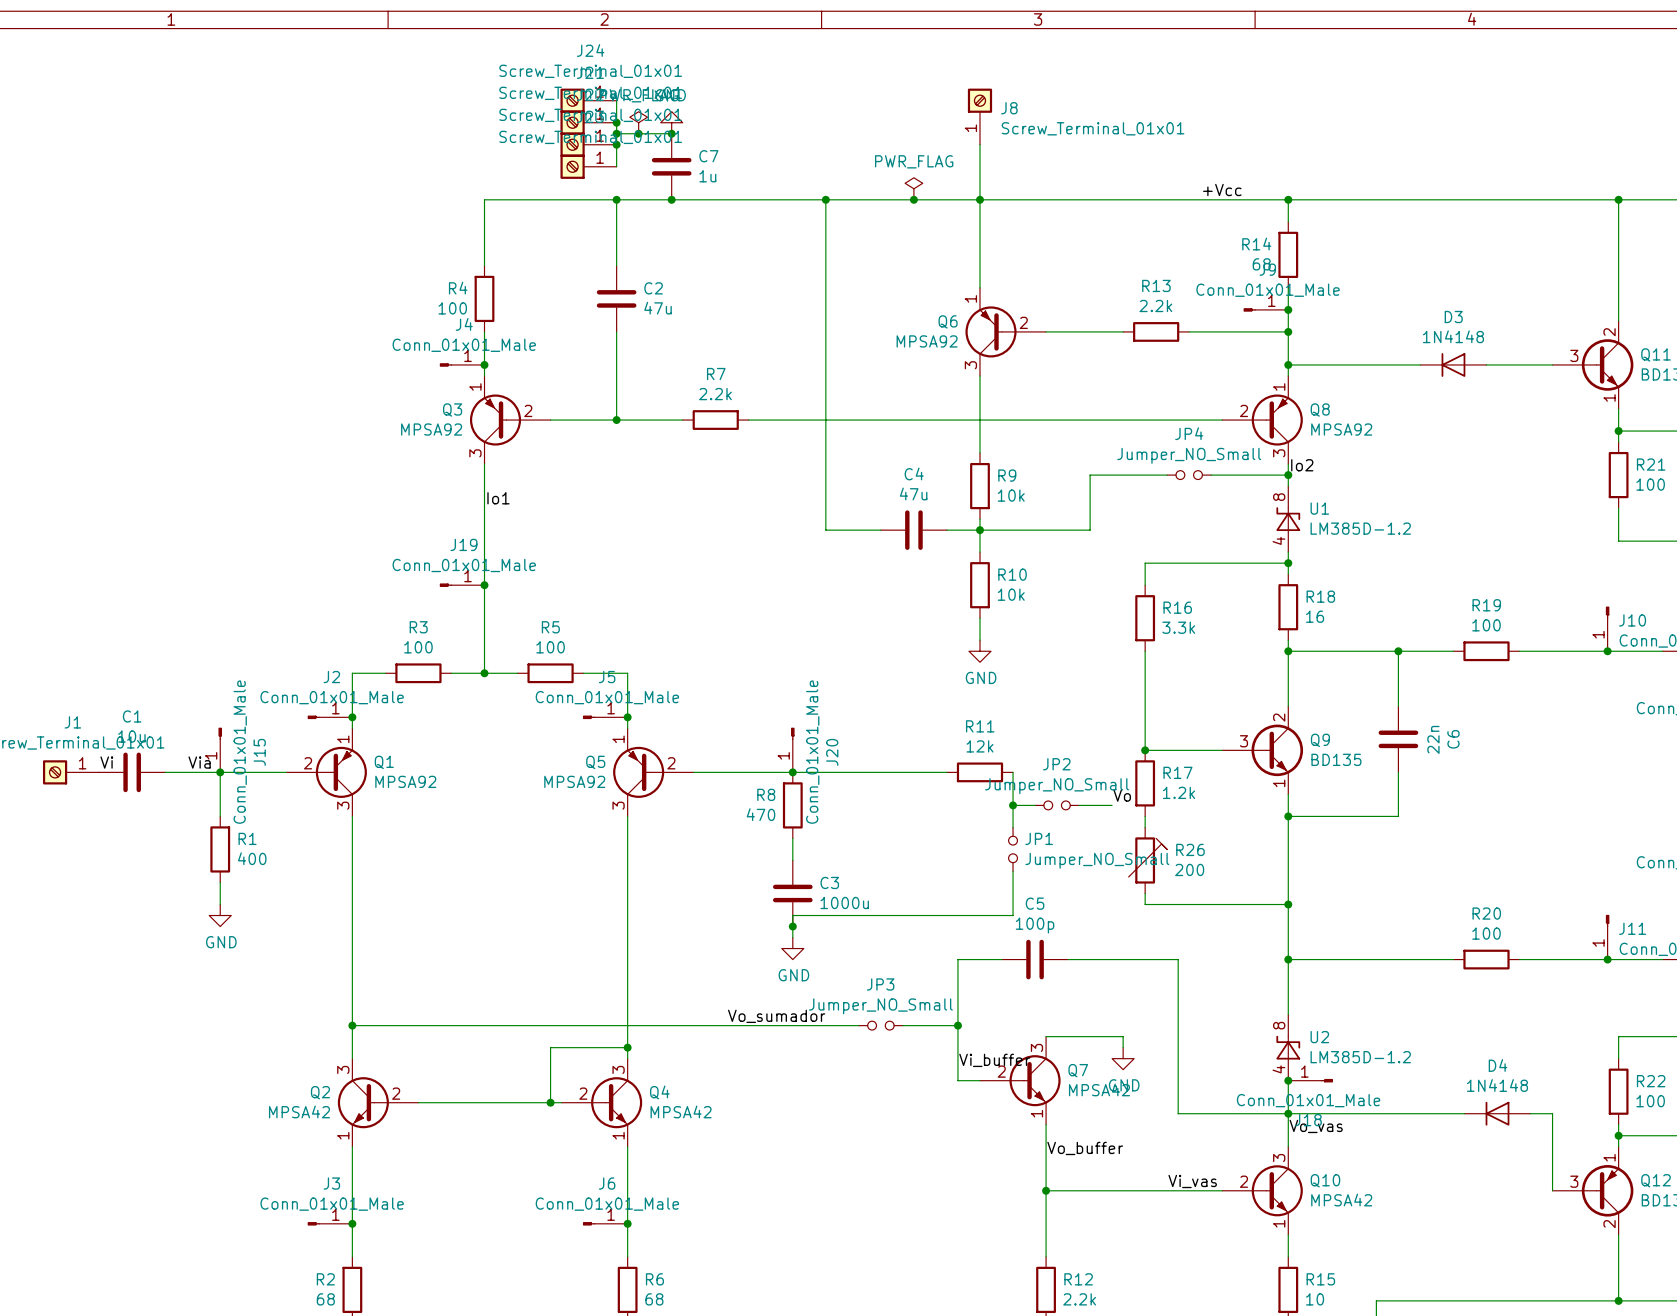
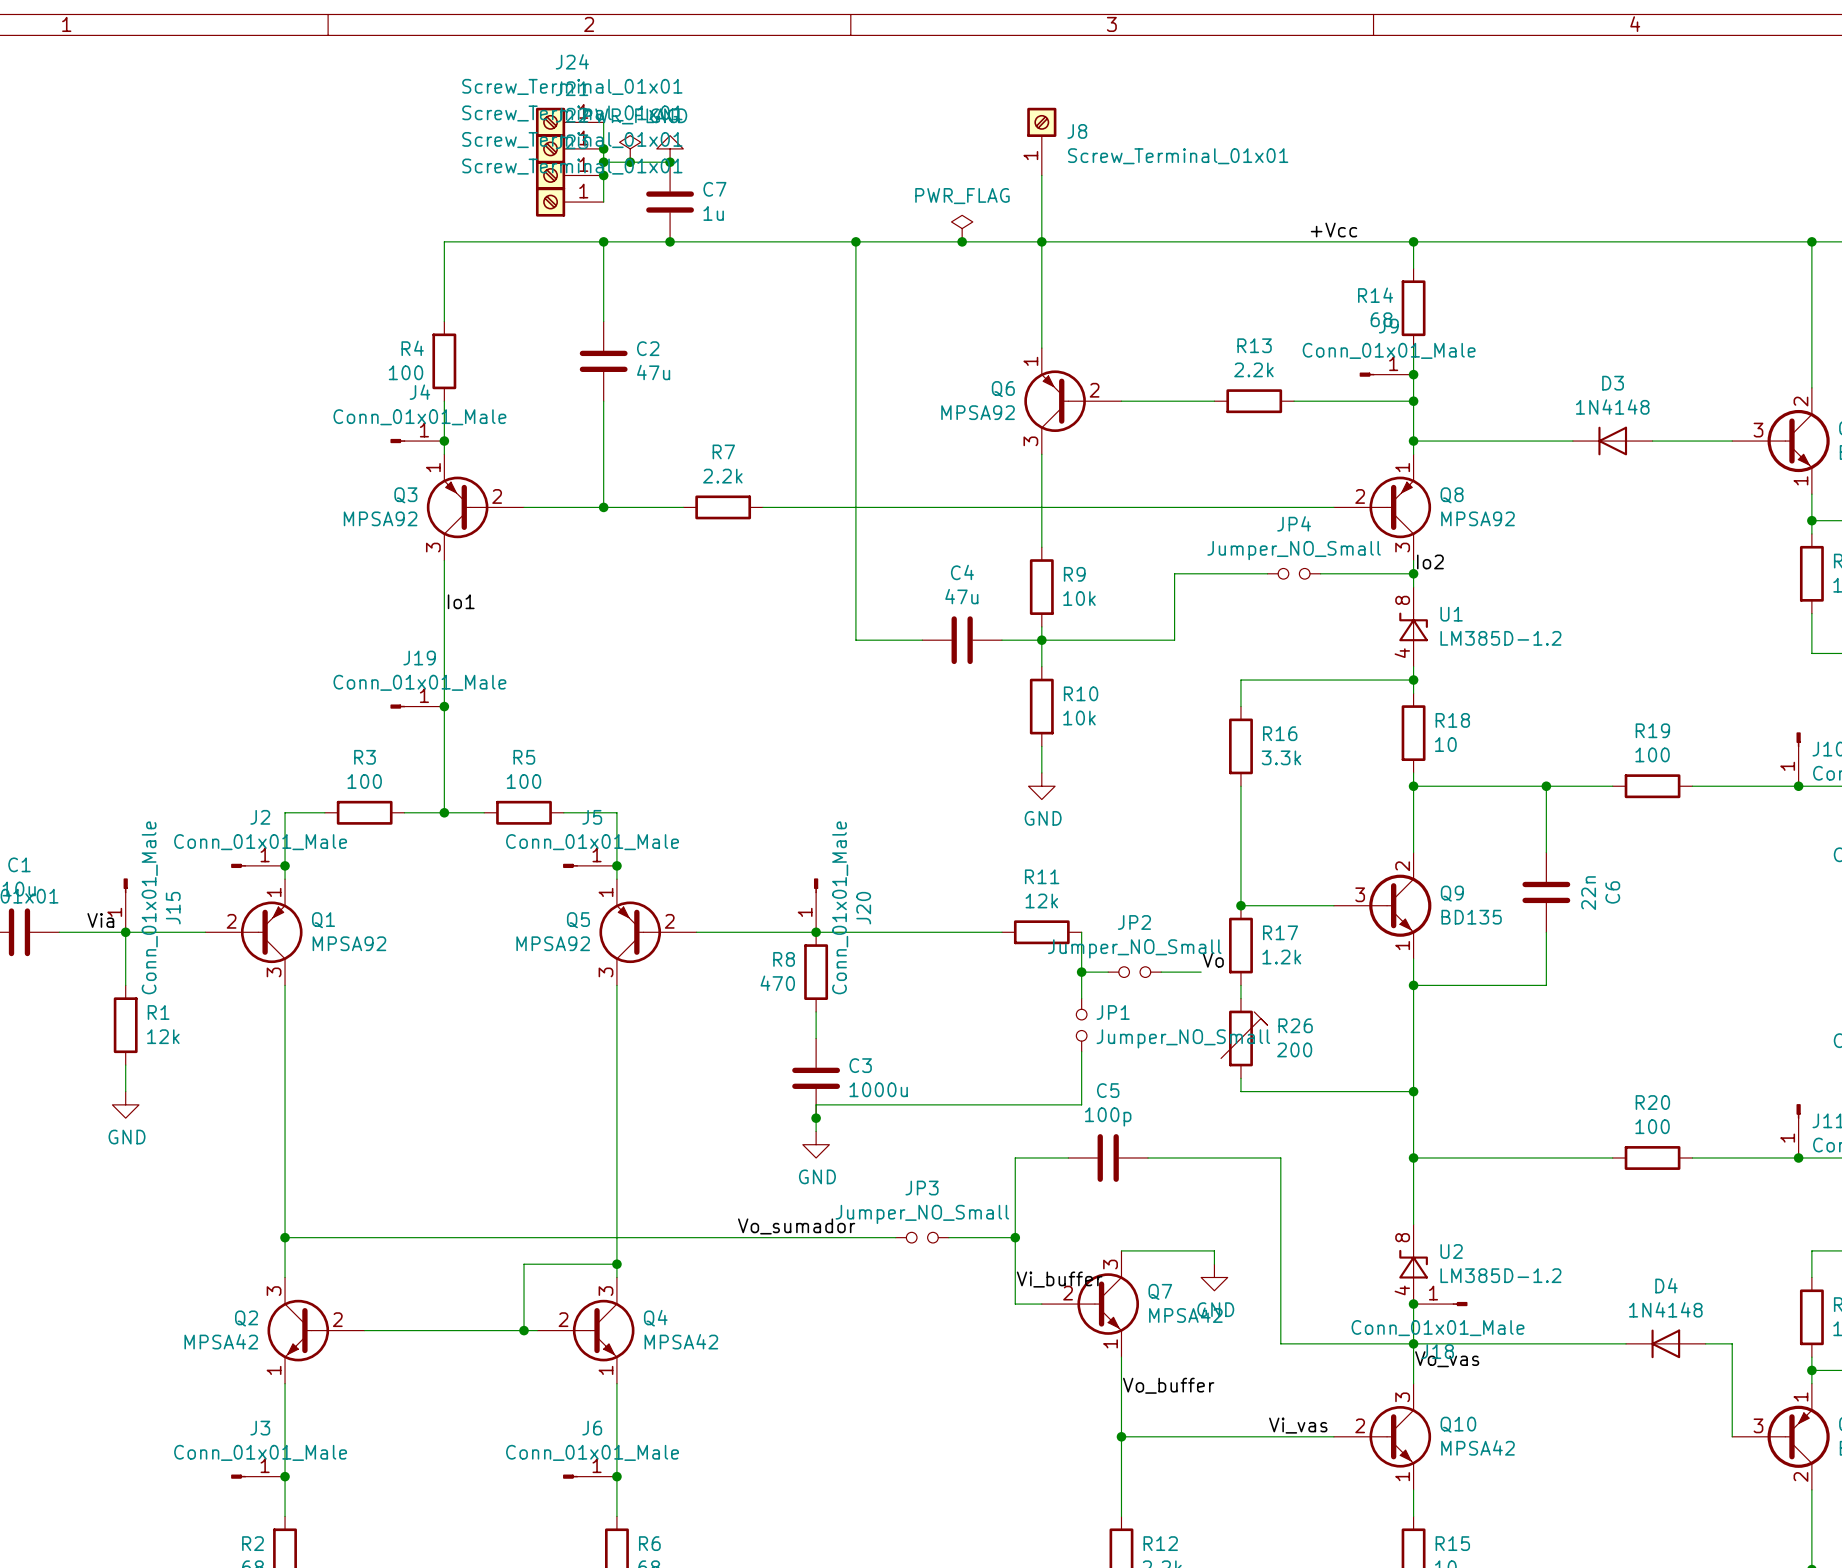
R18 value: 16 (1315, 616) -> 10 (1445, 744)
R1 value: 400 (252, 858) -> 12k (163, 1036)

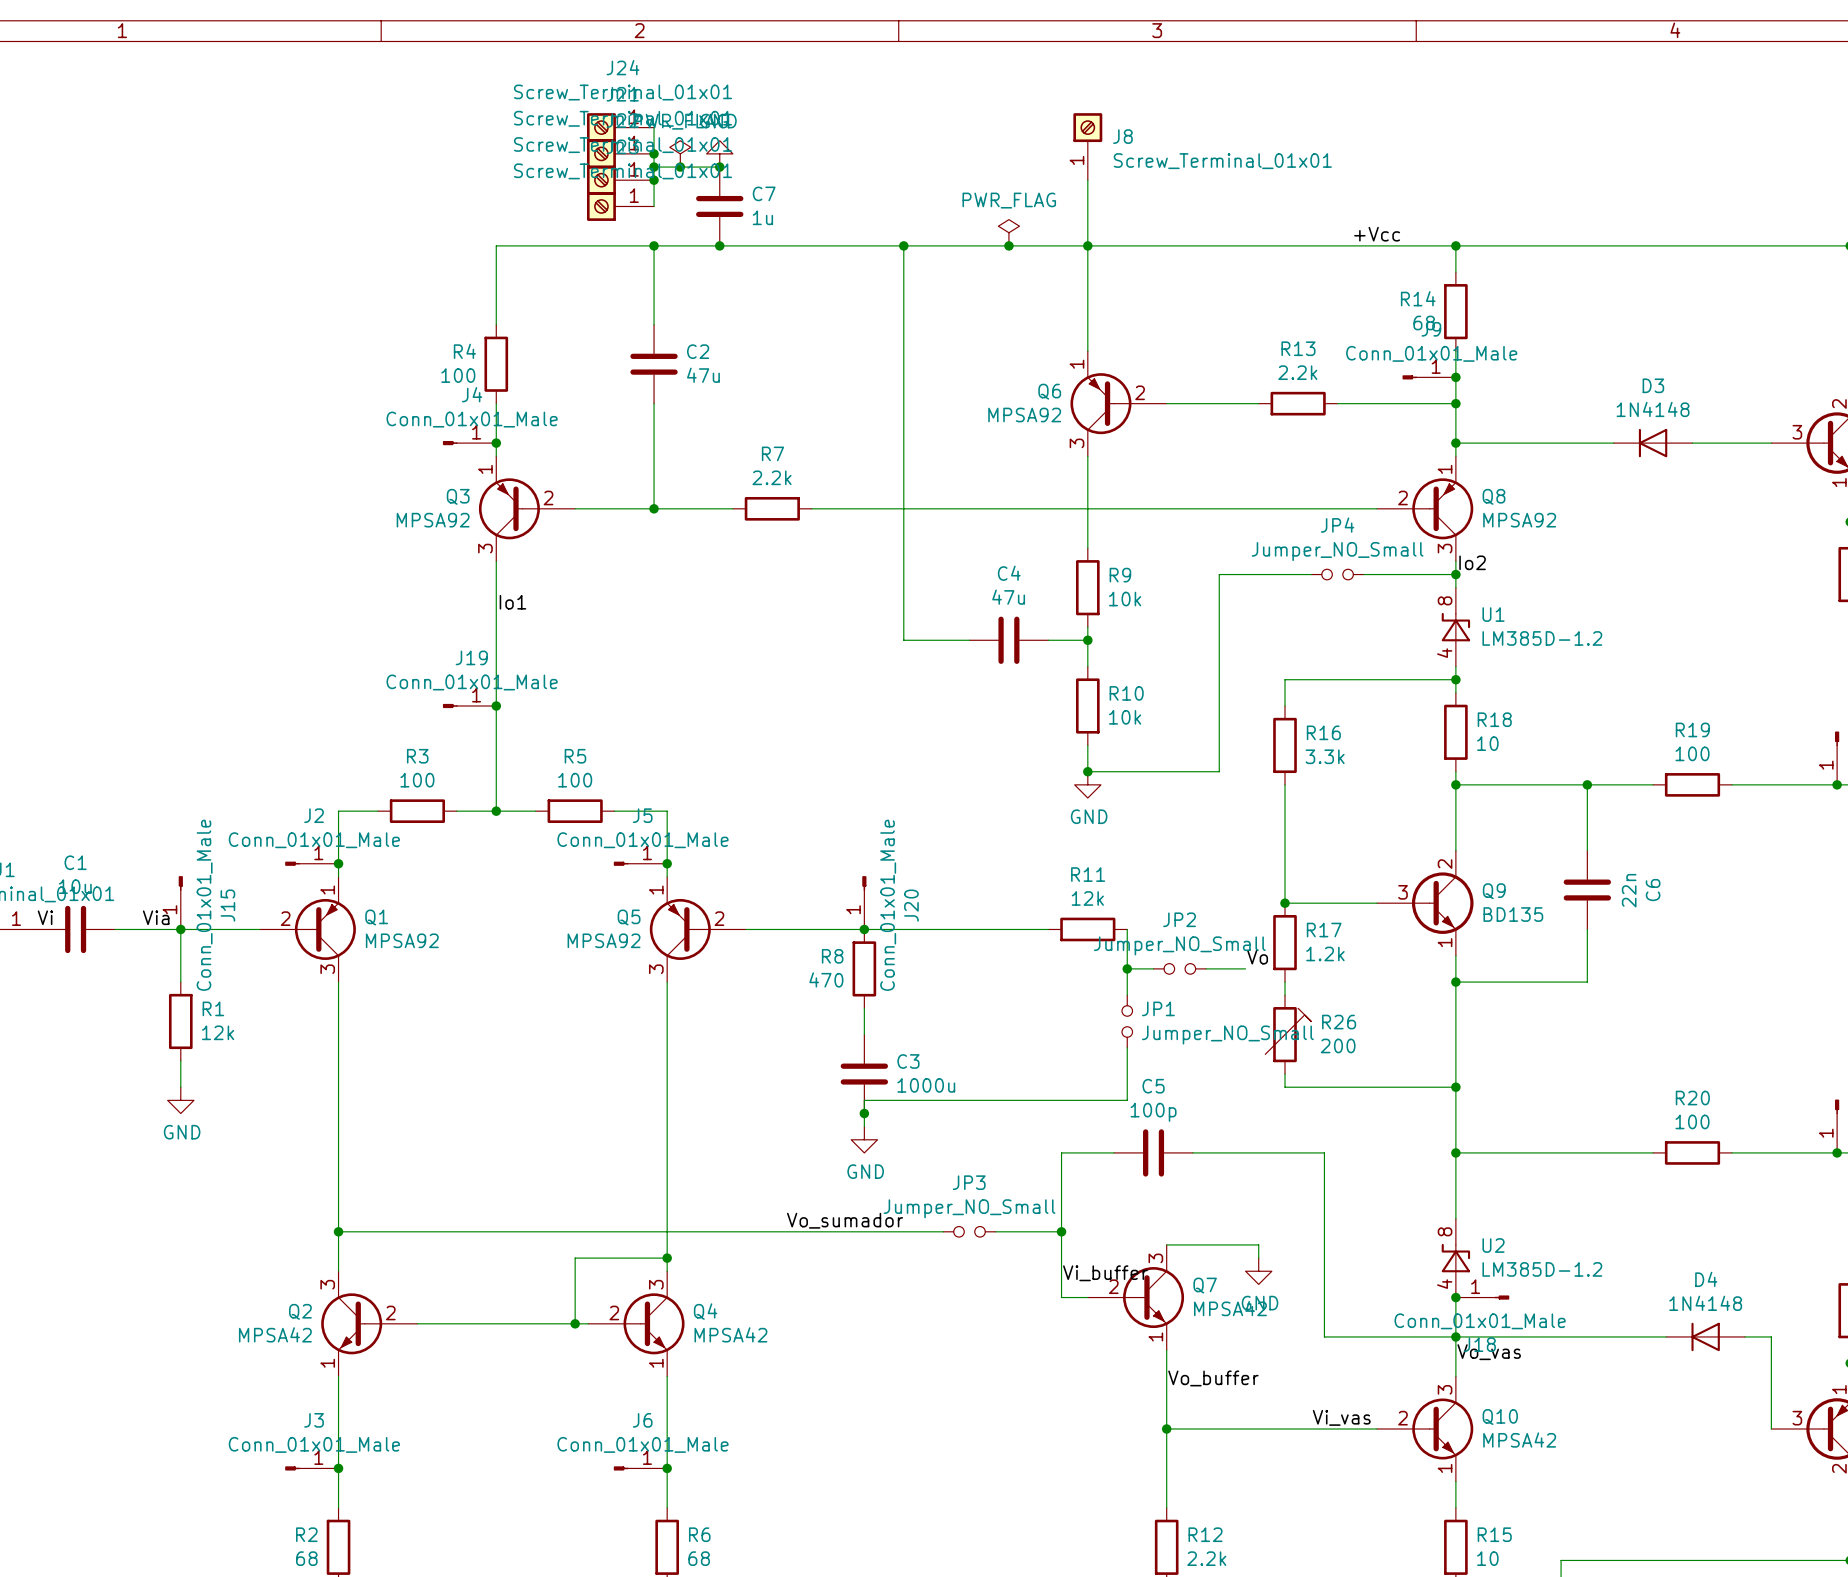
wire: (1041, 640) (1174, 640) -> (1087, 771) (1219, 771) (1219, 640)
junction: none -> (1087, 771)

